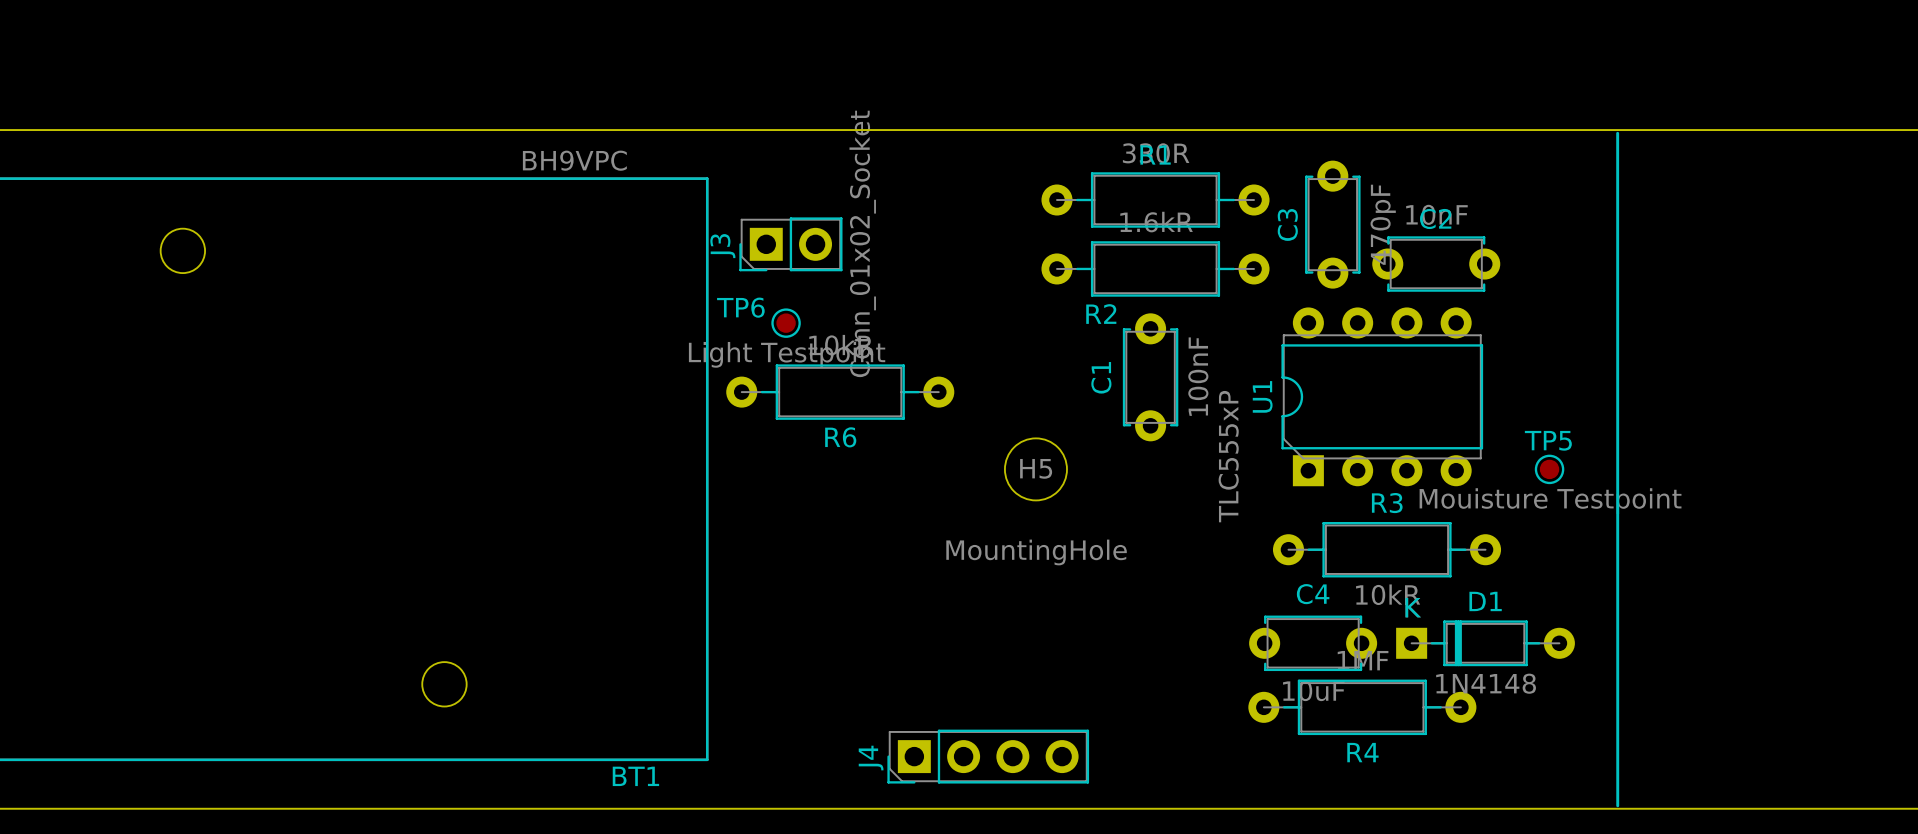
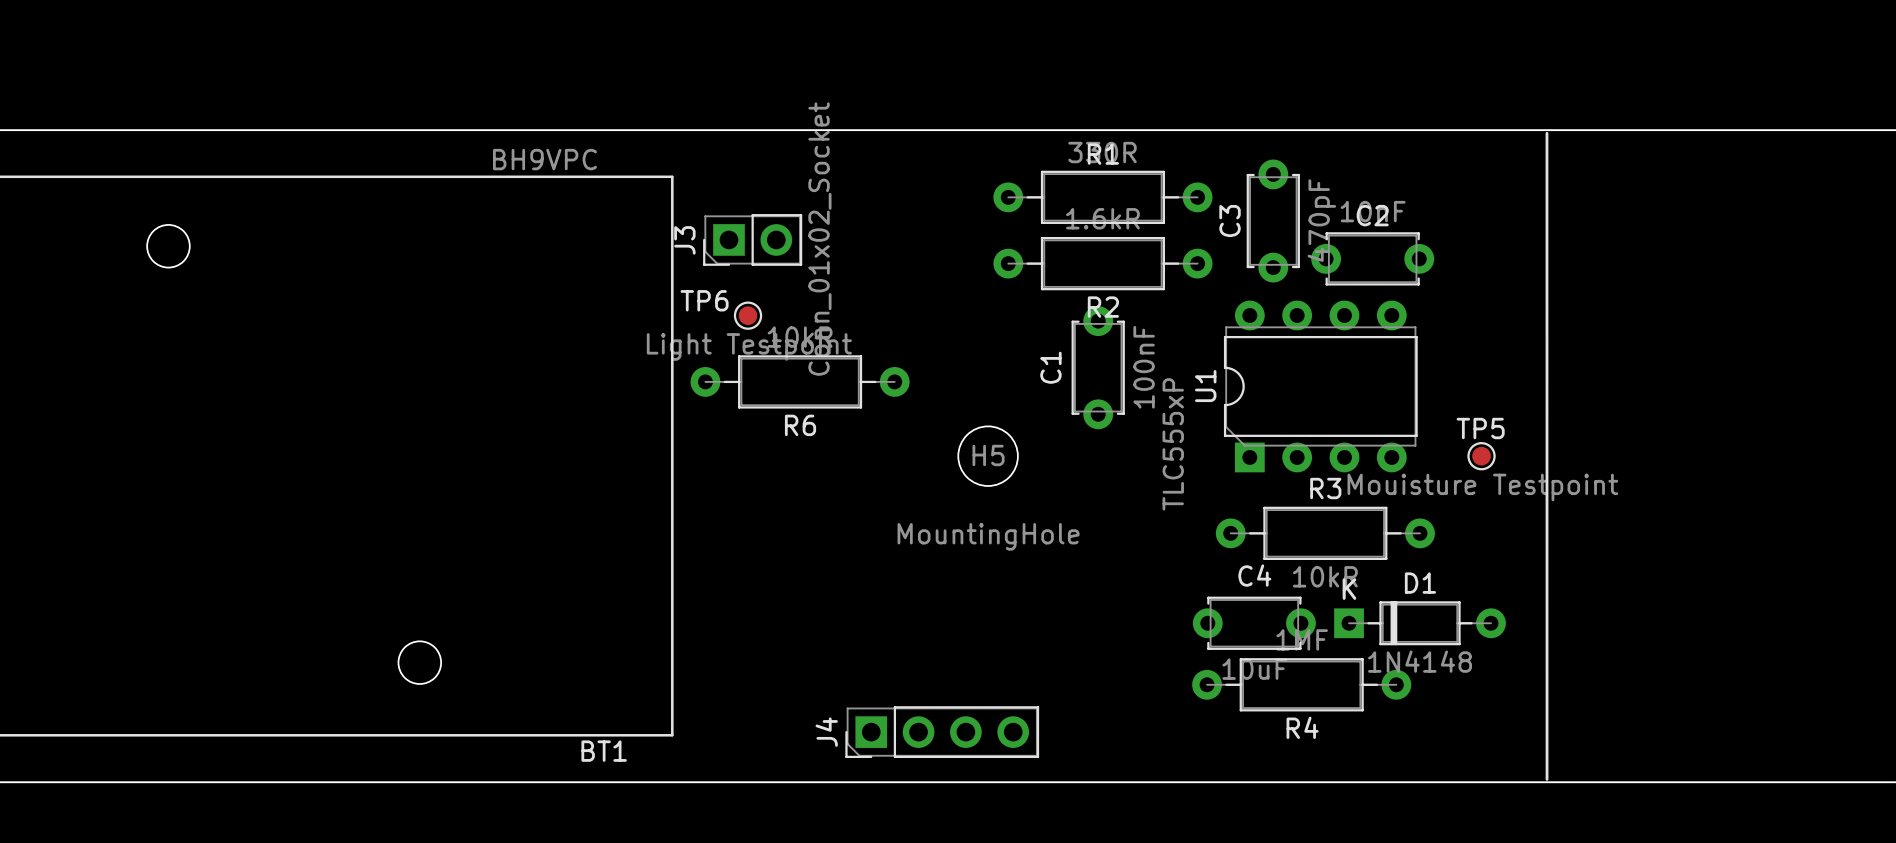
R2 name position: R2 (1101, 314) -> R2 (1103, 307)

